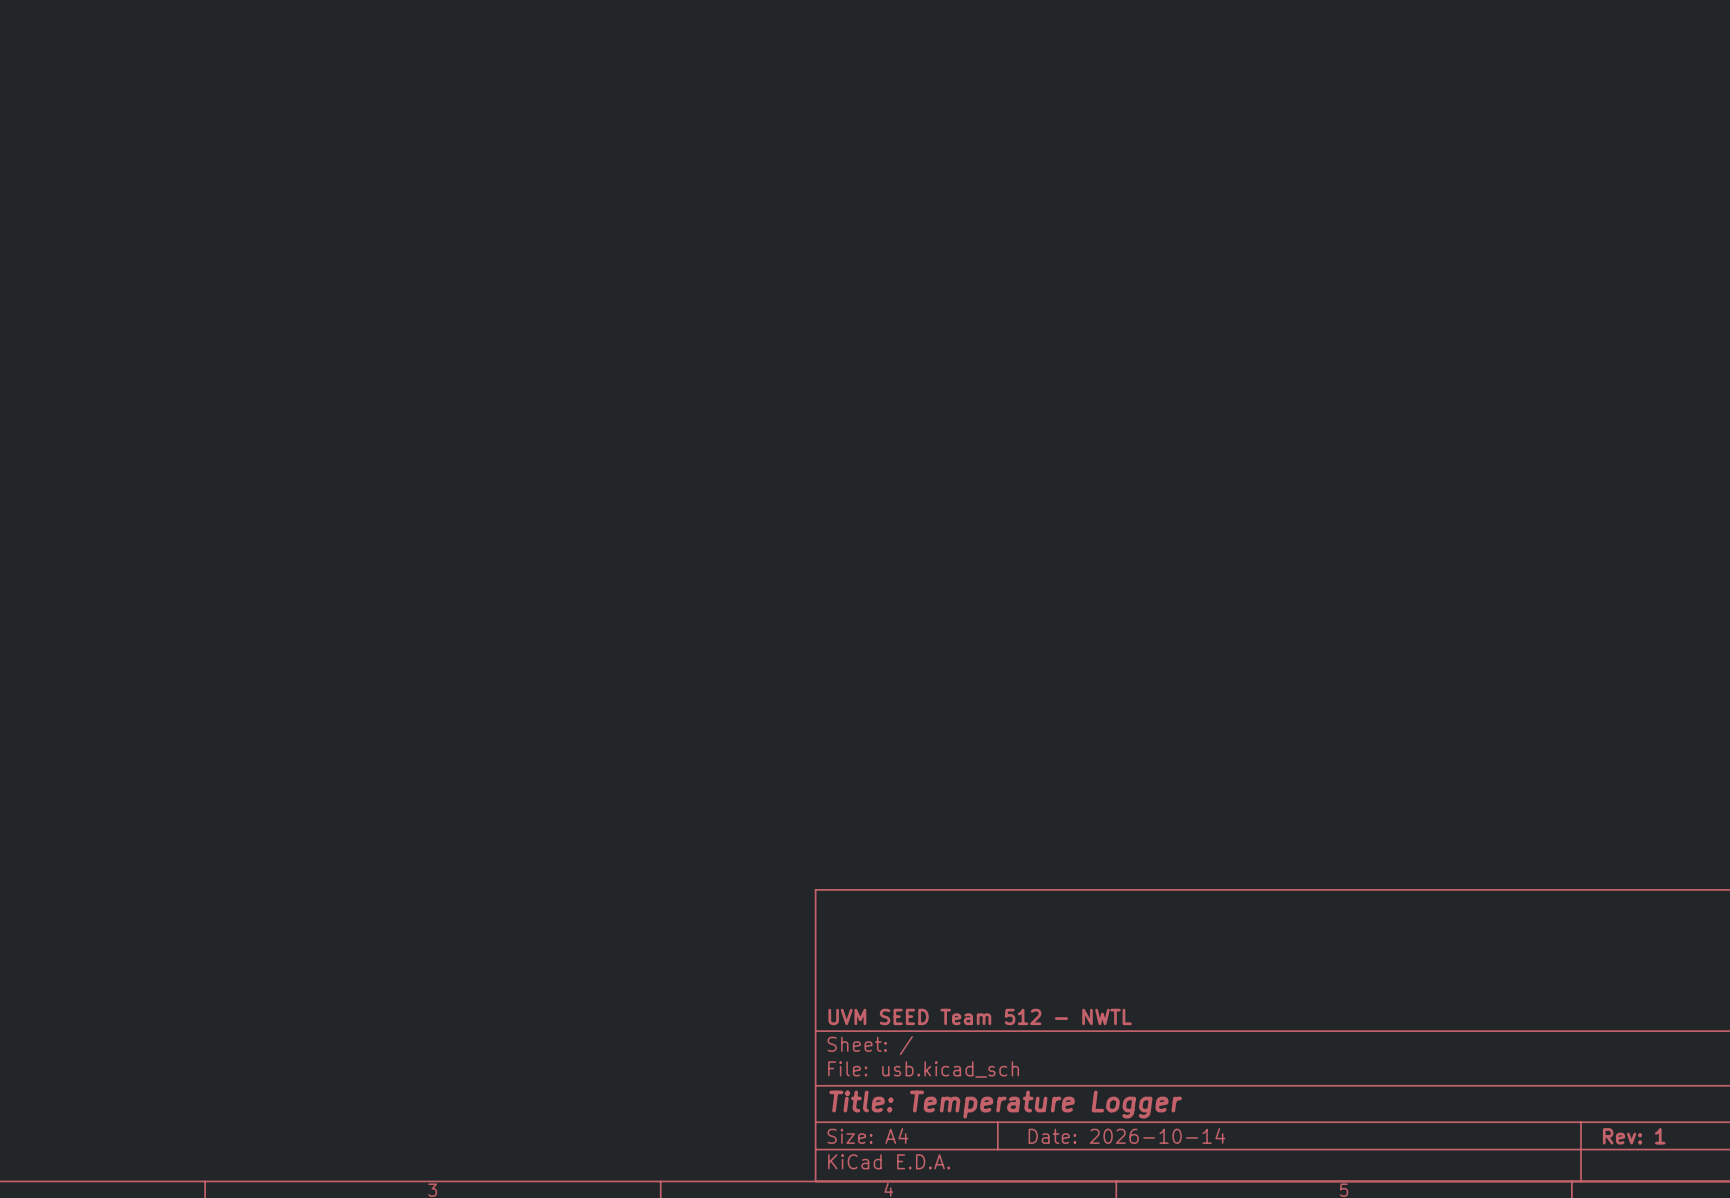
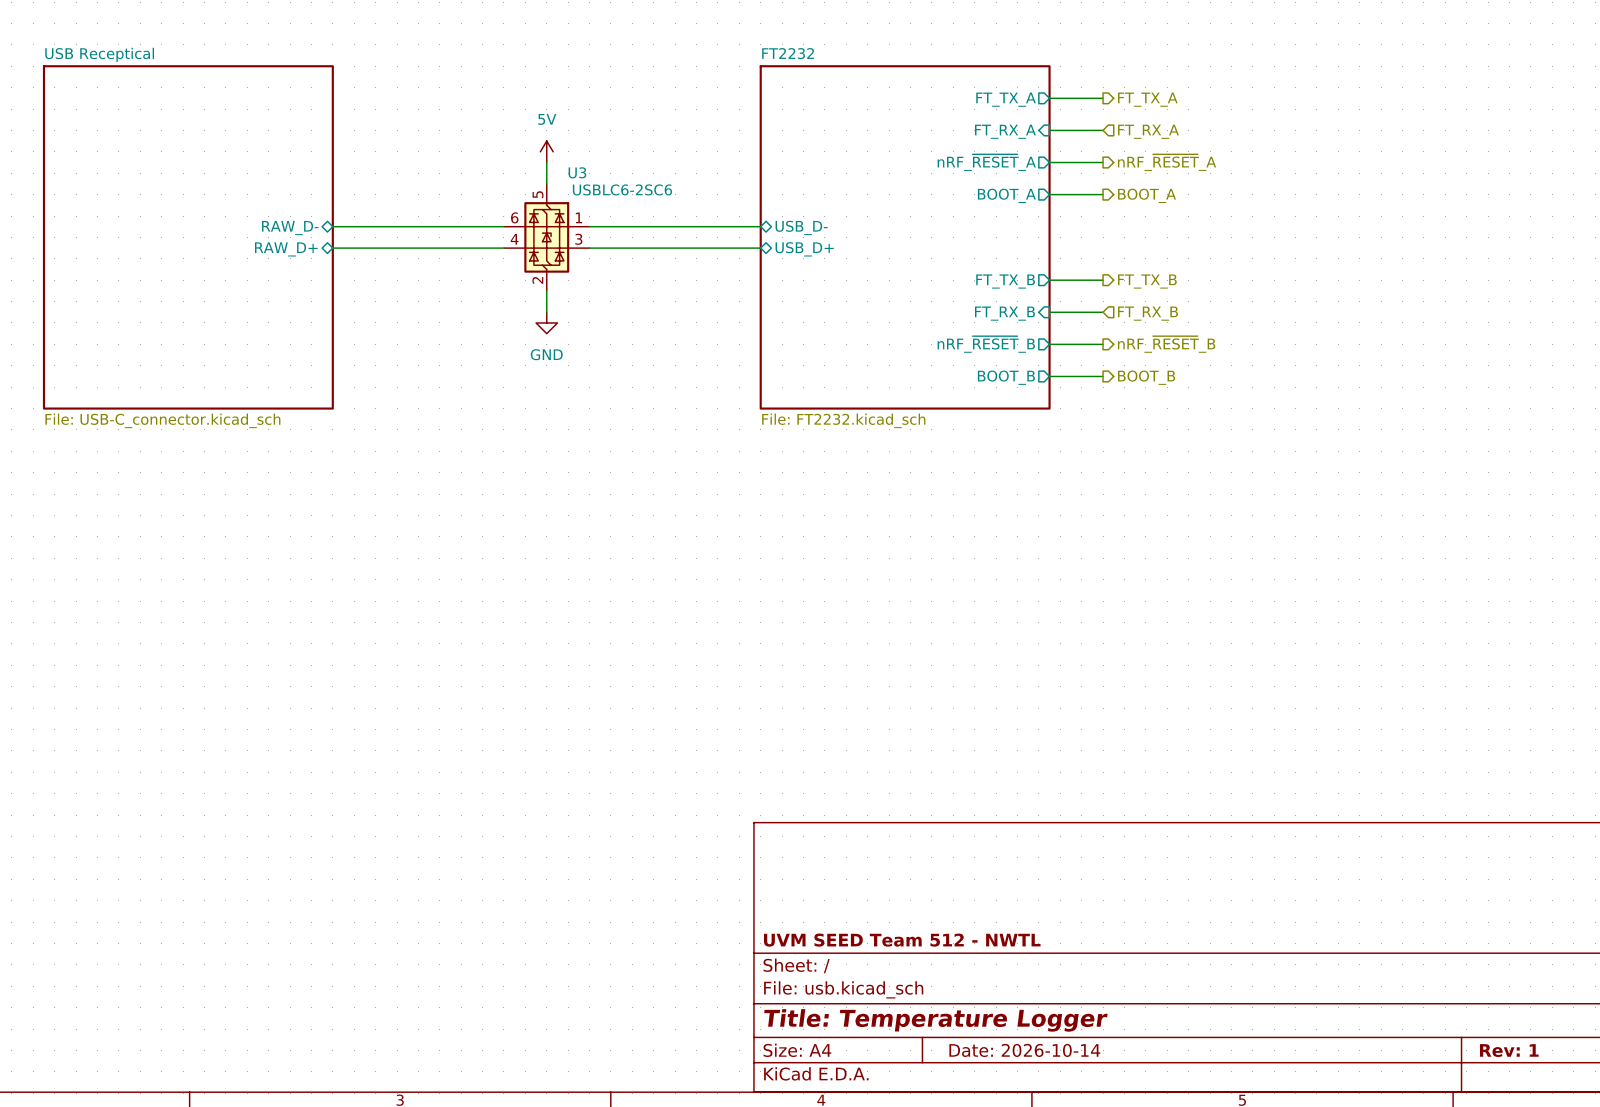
sheet pin: none -> FT_TX_A (1006, 99)
wire: none -> (1049, 98) (1103, 98)
hierarchical label: none -> FT_TX_A (1147, 99)
sheet pin: none -> FT_RX_A (1005, 131)
wire: none -> (1049, 130) (1103, 130)
hierarchical label: none -> FT_RX_A (1148, 131)
power symbol: none -> 5V (546, 151)
sheet pin: none -> nRF_~{RESET}_A (986, 162)
hierarchical label: none -> nRF_~{RESET}_A (1167, 162)
wire: none -> (546, 162) (546, 183)
wire: none -> (1049, 162) (1103, 162)
sheet pin: none -> BOOT_A (1006, 195)
wire: none -> (1049, 194) (1103, 194)
hierarchical label: none -> BOOT_A (1147, 195)
sheet pin: none -> RAW_D- (290, 228)
wire: none -> (332, 226) (503, 226)
wire: none -> (589, 226) (760, 226)
sheet pin: none -> USB_D- (801, 227)
sheet USB Receptical: none -> File: USB-C_connector.kicad_sch (188, 237)
U3: none -> USBLC6-2SC6 (546, 237)
sheet FT2232: none -> File: FT2232.kicad_sch (905, 237)
sheet pin: none -> RAW_D+ (286, 249)
wire: none -> (332, 248) (503, 248)
wire: none -> (589, 248) (760, 248)
sheet pin: none -> USB_D+ (804, 249)
sheet pin: none -> FT_TX_B (1005, 281)
wire: none -> (1049, 280) (1103, 280)
hierarchical label: none -> FT_TX_B (1147, 281)
wire: none -> (546, 290) (546, 312)
sheet pin: none -> FT_RX_B (1004, 313)
wire: none -> (1049, 312) (1103, 312)
hierarchical label: none -> FT_RX_B (1148, 313)
power symbol: none -> GND (546, 322)
sheet pin: none -> nRF_~{RESET}_B (986, 344)
hierarchical label: none -> nRF_~{RESET}_B (1166, 344)
wire: none -> (1049, 344) (1103, 344)
sheet pin: none -> BOOT_B (1006, 377)
wire: none -> (1049, 376) (1103, 376)
hierarchical label: none -> BOOT_B (1146, 377)

